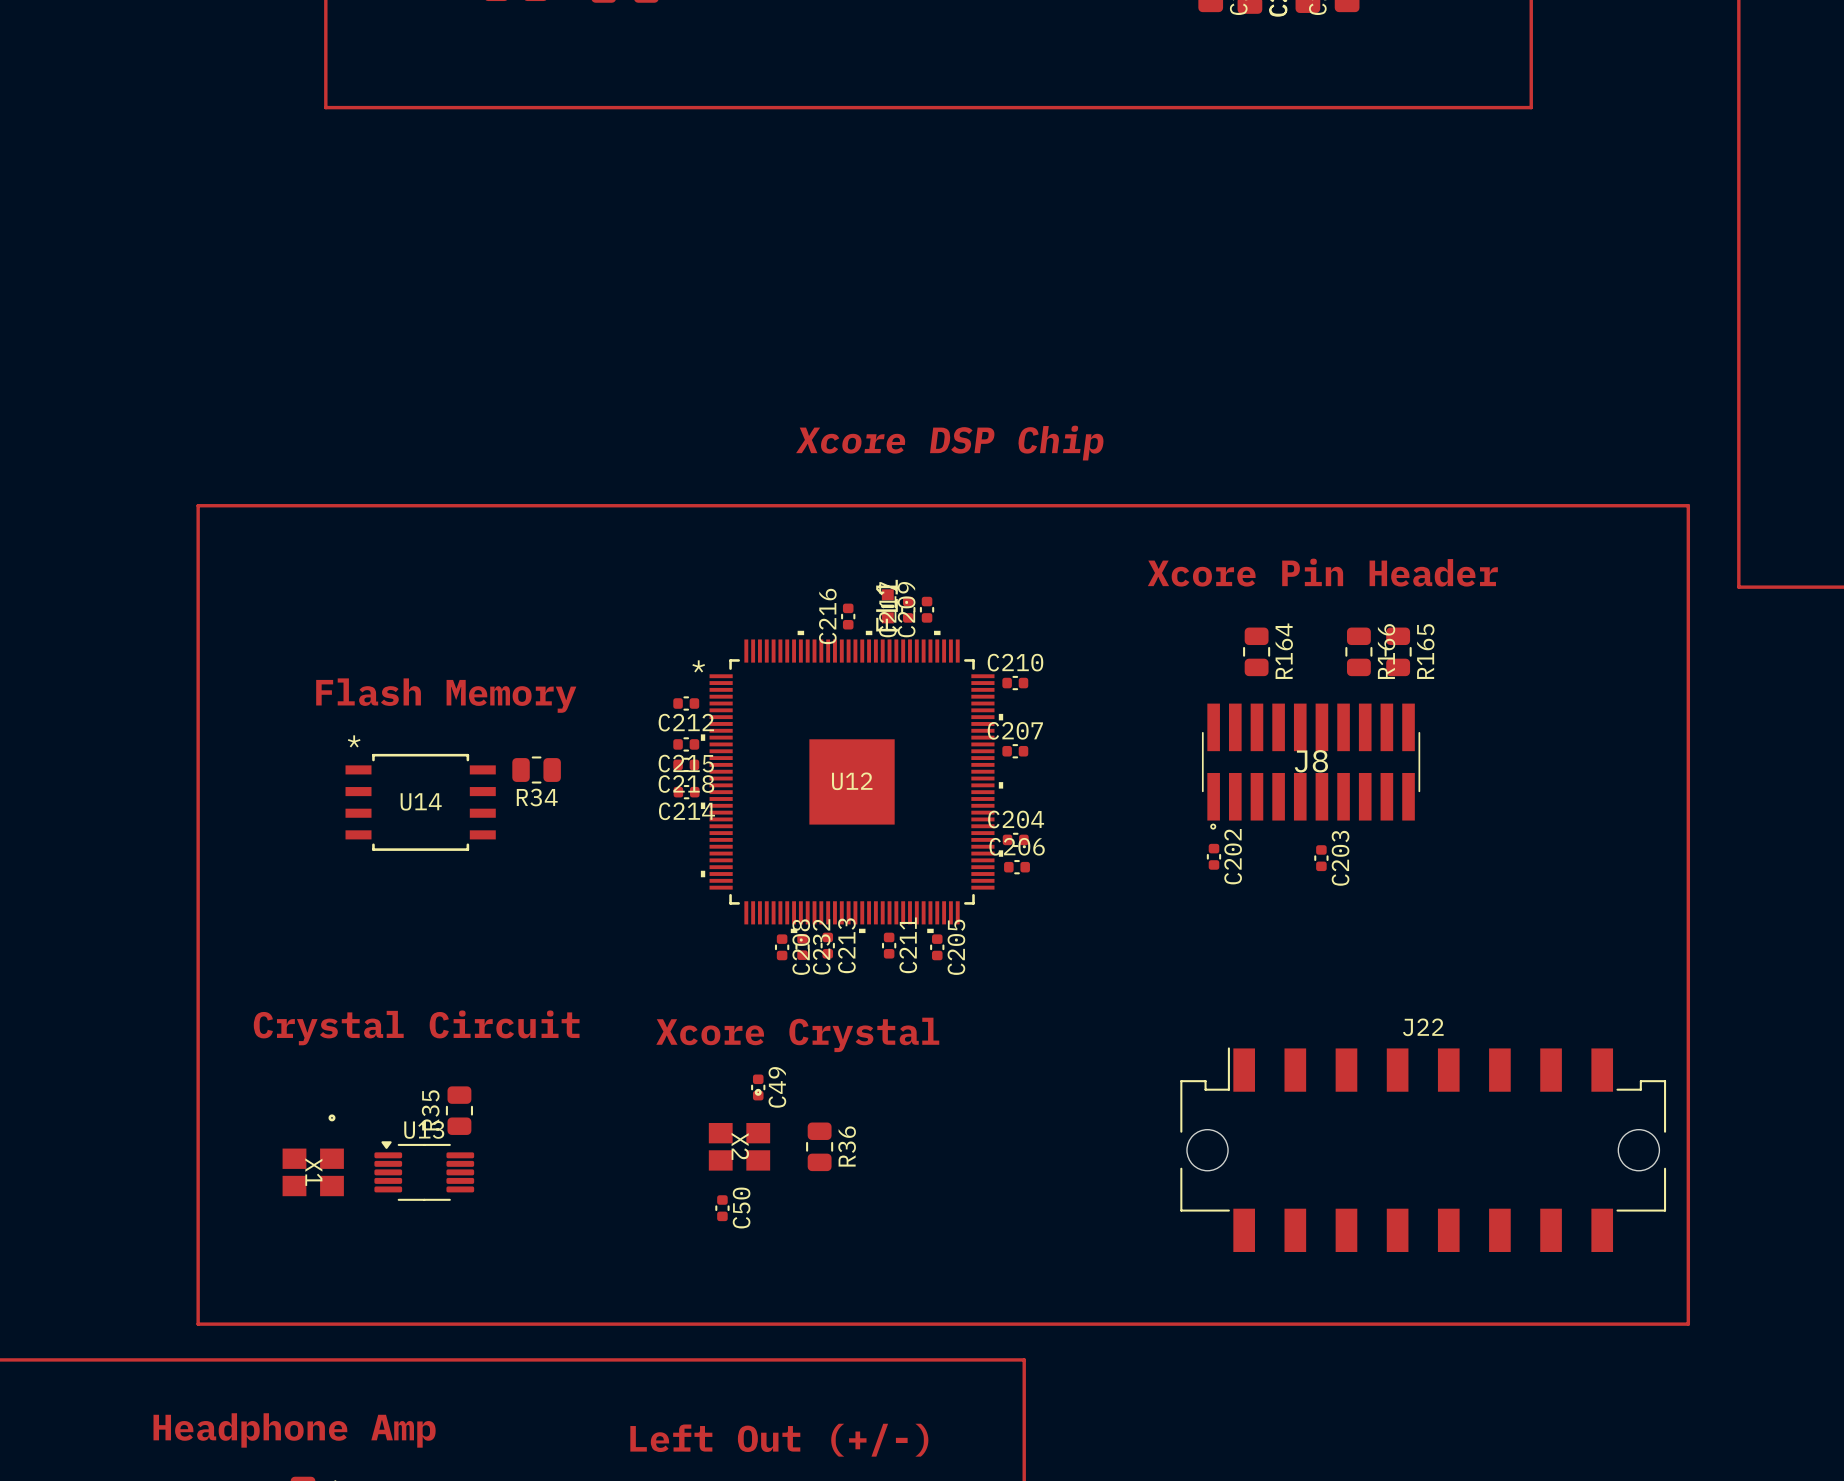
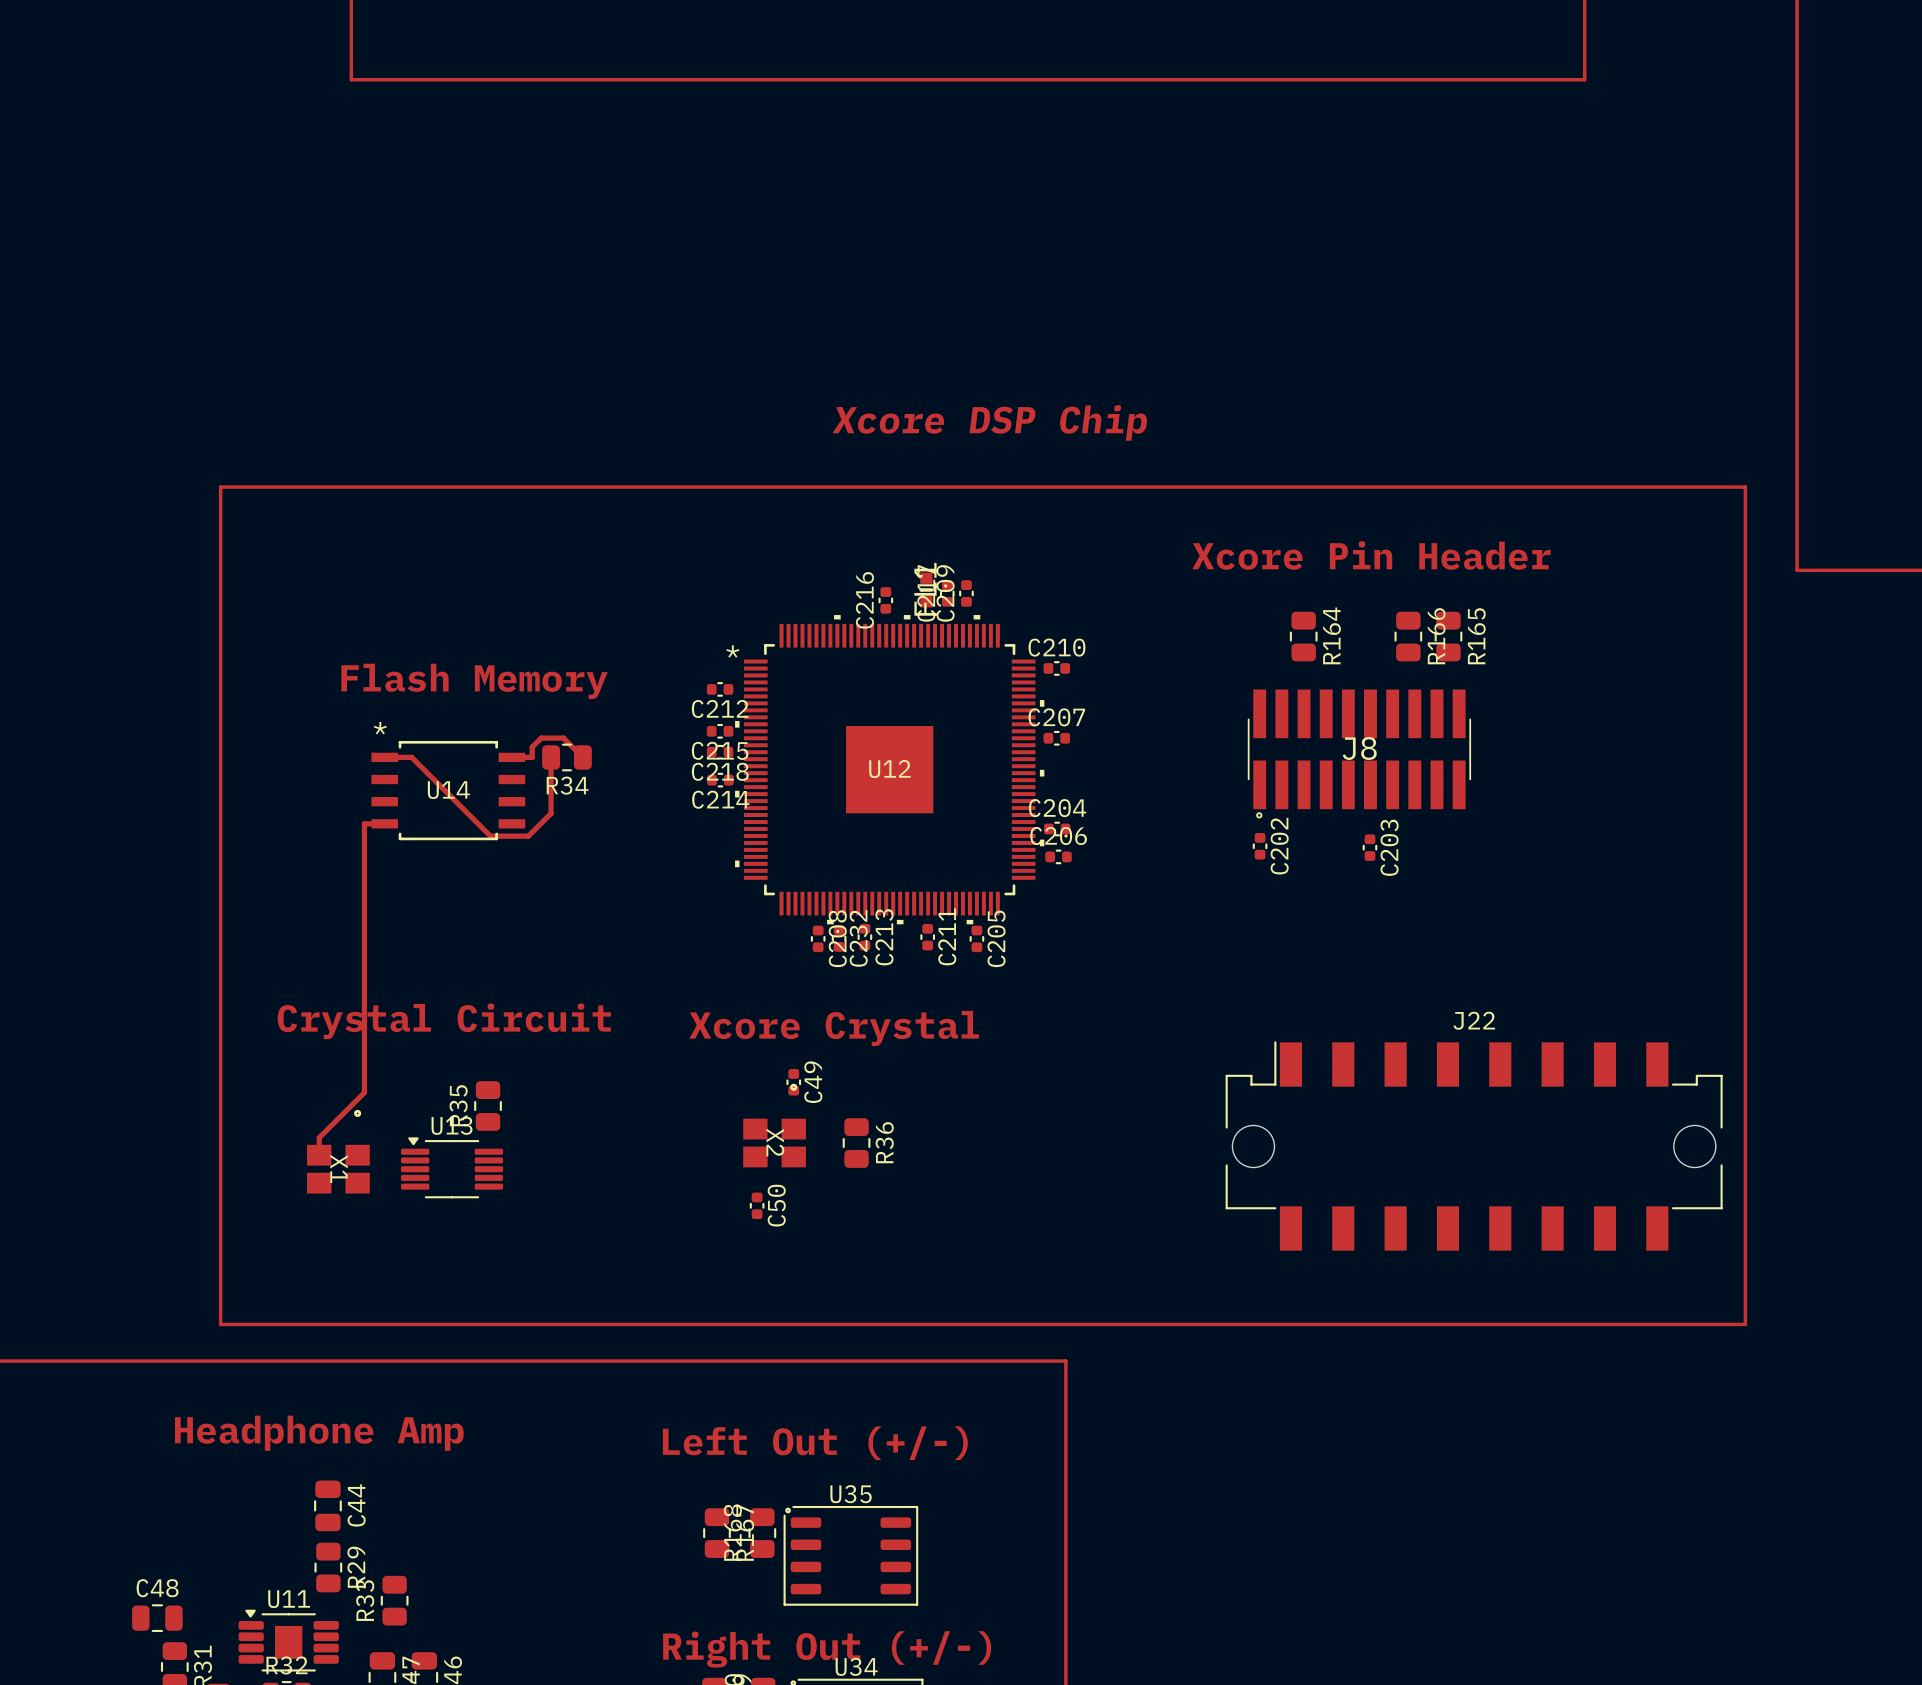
track: none -> (384, 757) (411, 757) (490, 836) (528, 836) (551, 813) (551, 757)
track: none -> (511, 757) (532, 757) (532, 747) (541, 738) (563, 738) (582, 757)
track: none -> (384, 823) (364, 823) (364, 1092) (319, 1137) (319, 1155)

